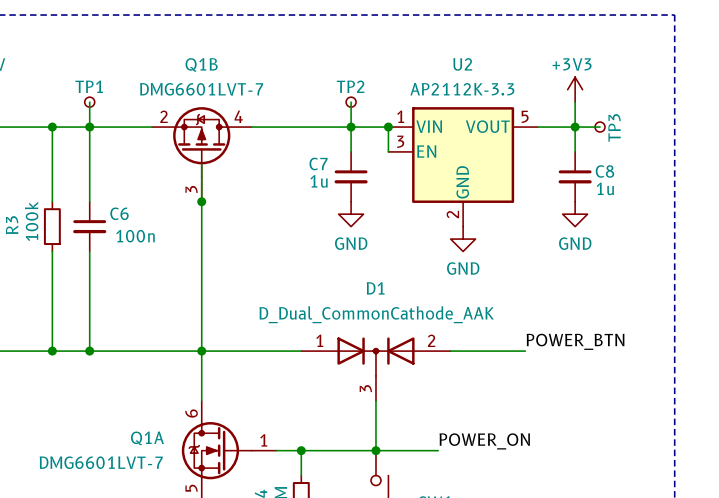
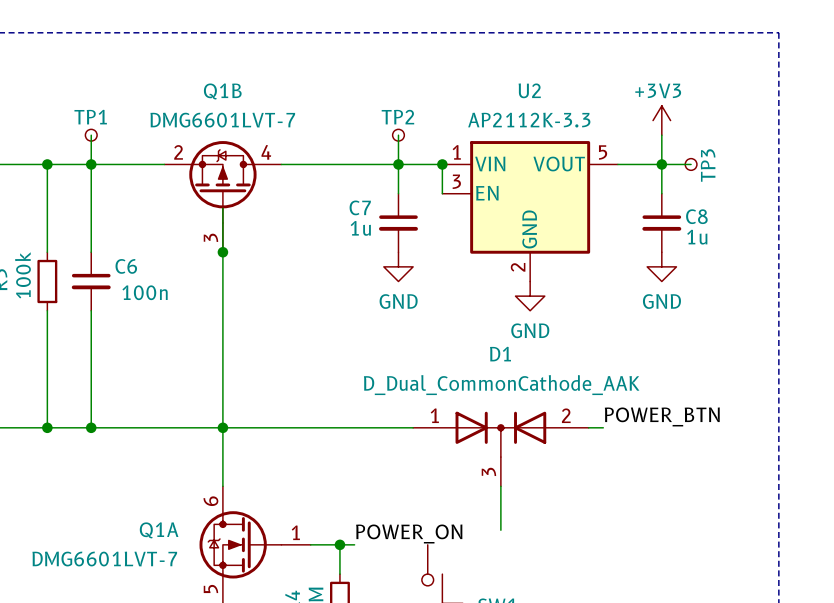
D1 position: (375, 369) -> (500, 449)
wire: (375, 400) (375, 450) -> none
wire: none -> (500, 486) (500, 530)
label position: POWER_ON (484, 441) -> POWER_ON (409, 533)
wire: (313, 450) (438, 450) -> none
junction: (375, 450) -> none

